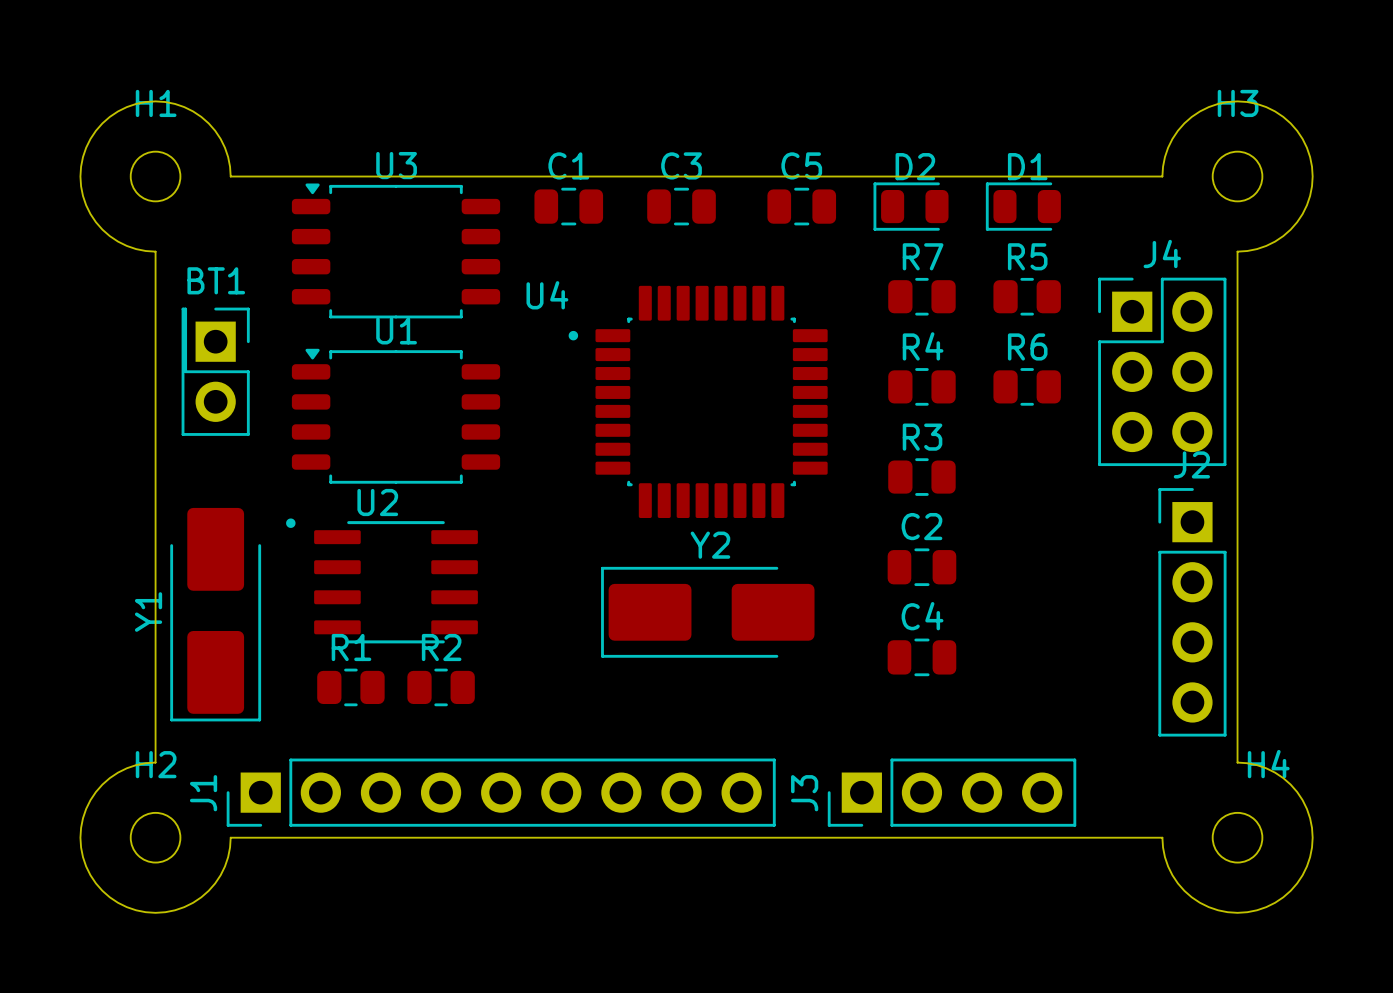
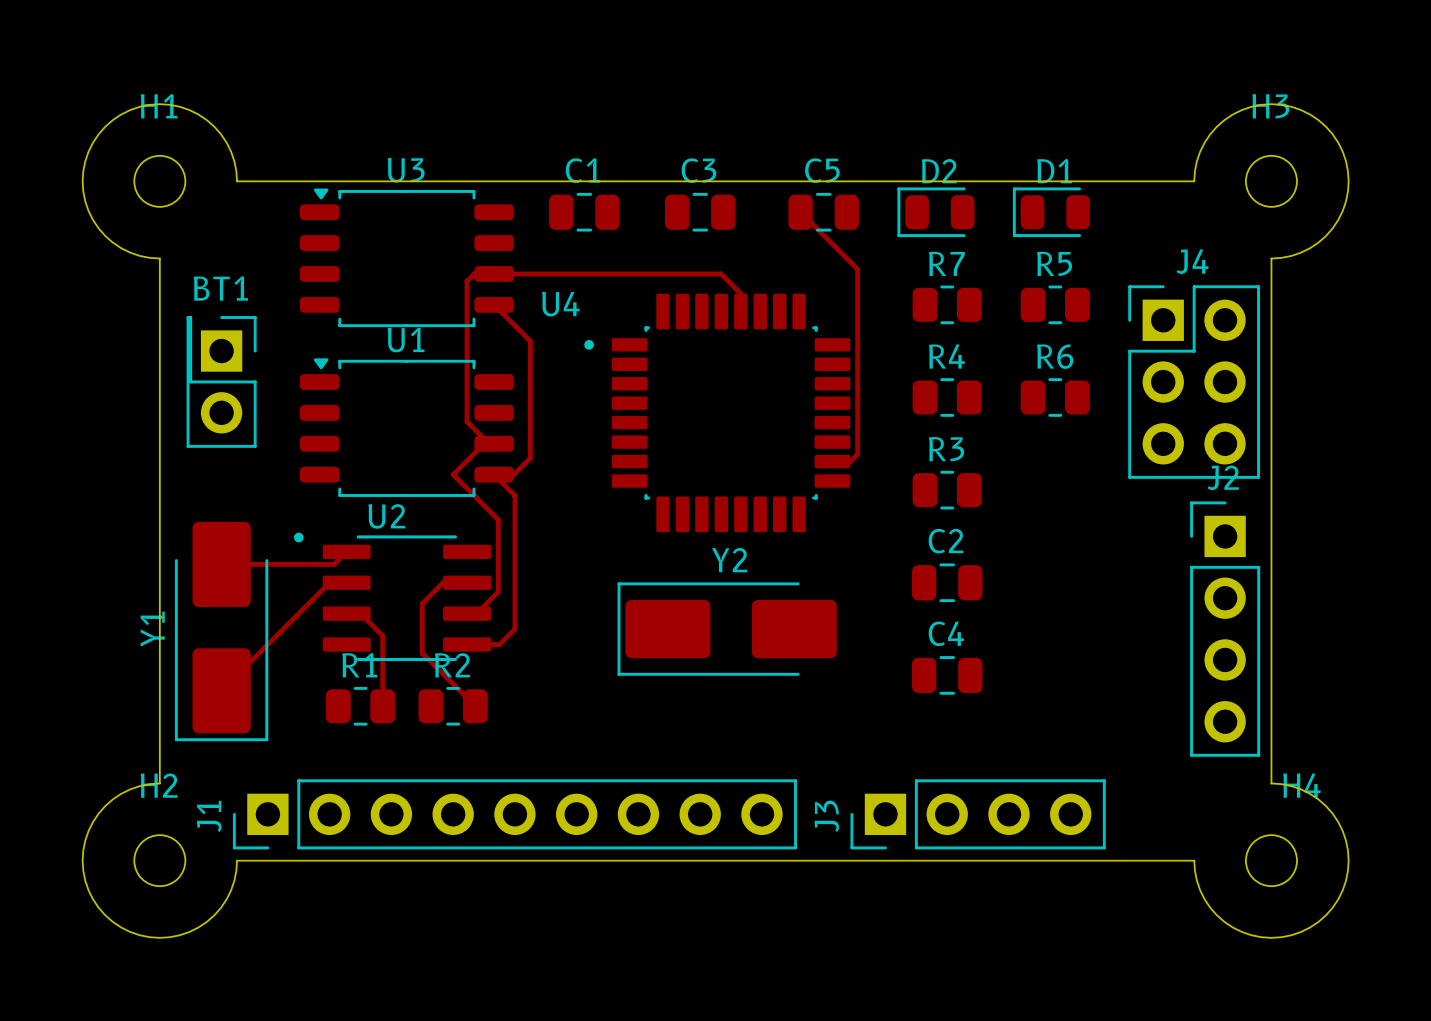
track: none -> (800, 212) (857, 269) (857, 454) (850, 461) (817, 461)
track: none -> (494, 304) (530, 341) (530, 458) (513, 474) (494, 474) (514, 495) (514, 629) (499, 644) (467, 644)
track: none -> (740, 311) (740, 293) (721, 273) (474, 273) (467, 281) (467, 421) (489, 443)
track: none -> (494, 443) (484, 443) (453, 474) (498, 519) (498, 591) (476, 613) (467, 613)
track: none -> (346, 551) (334, 564) (221, 564)
track: none -> (346, 582) (329, 582) (221, 690)
track: none -> (467, 582) (443, 582) (422, 603) (422, 653) (475, 706)
track: none -> (346, 613) (360, 613) (382, 635) (382, 706)

